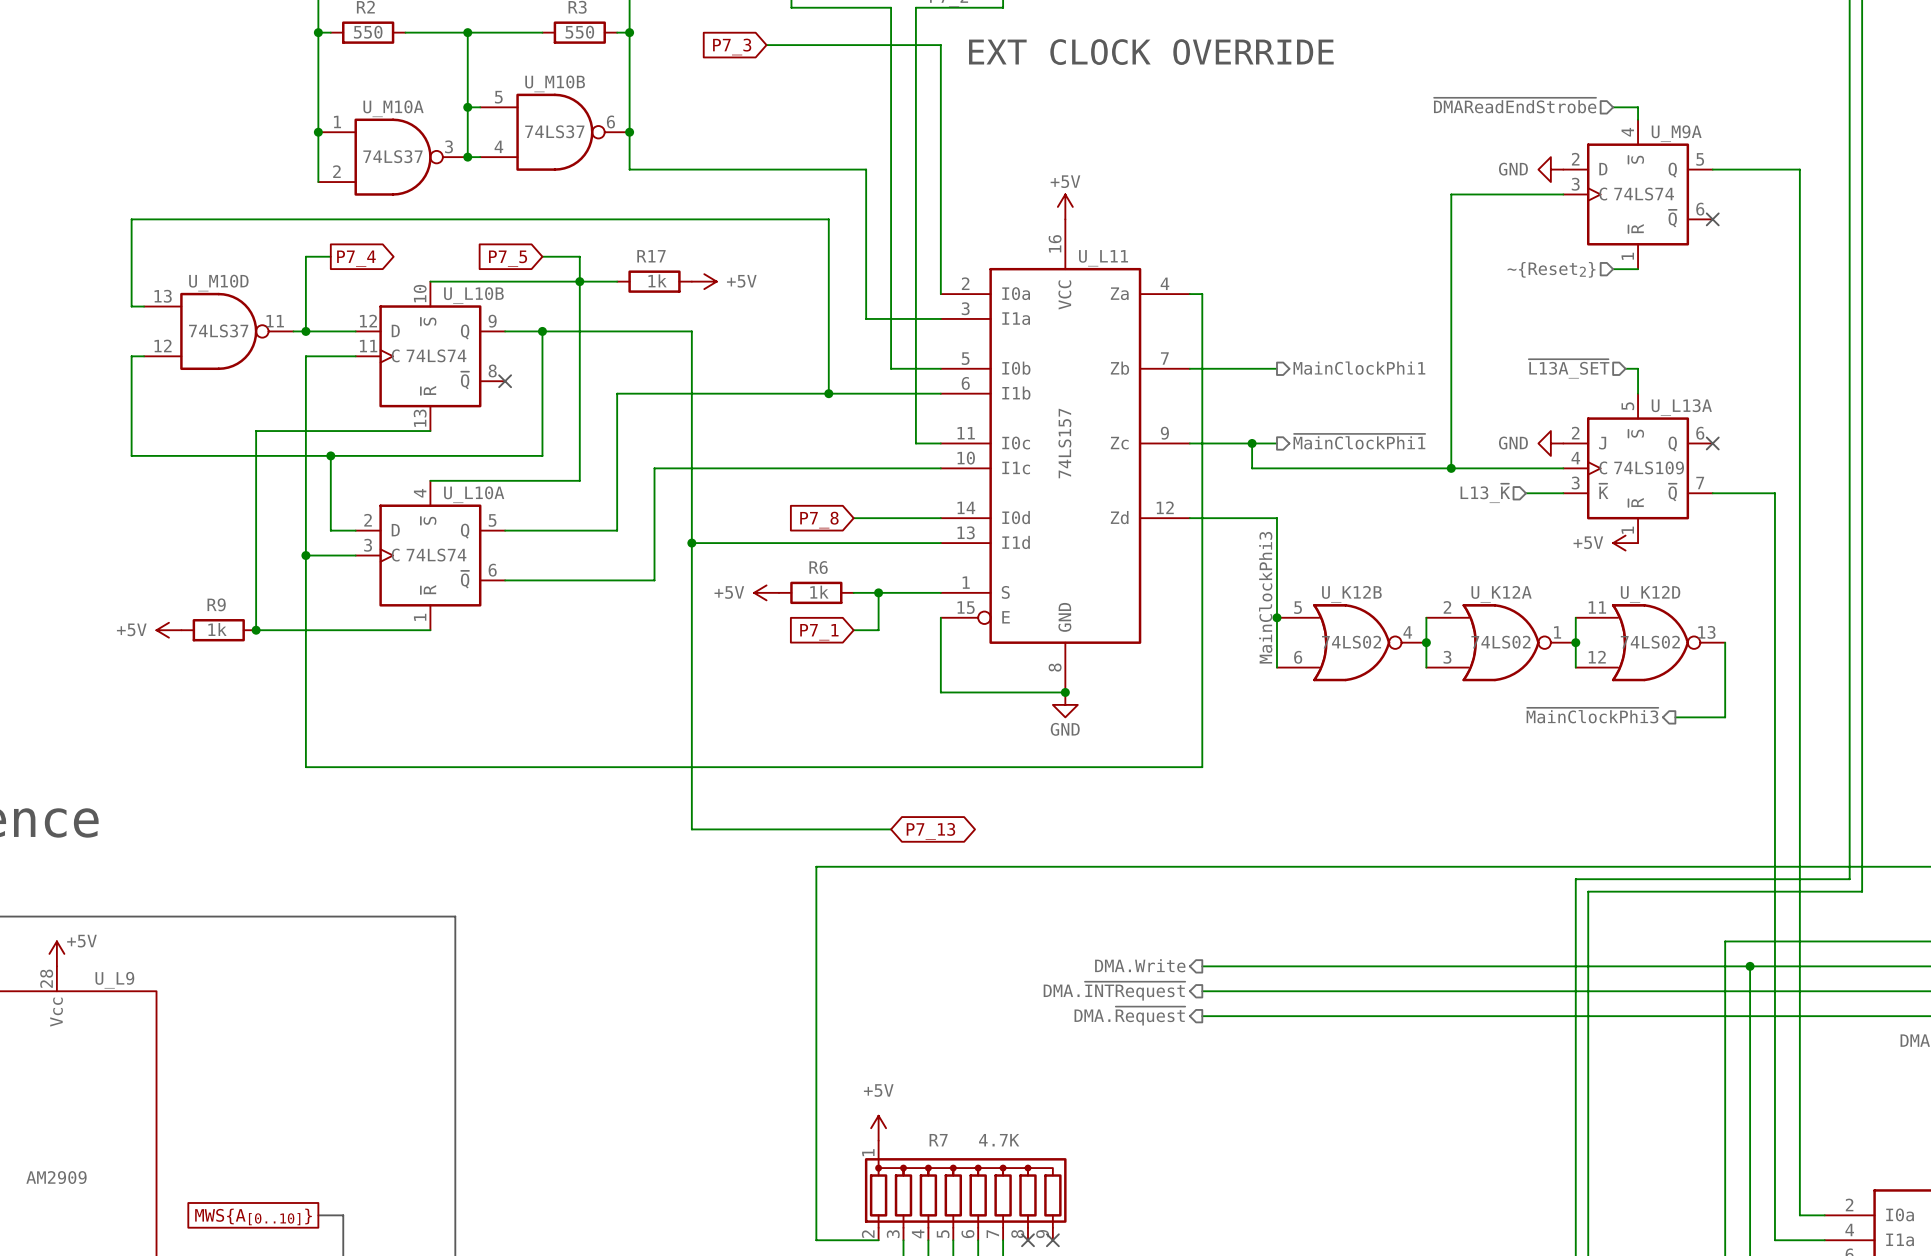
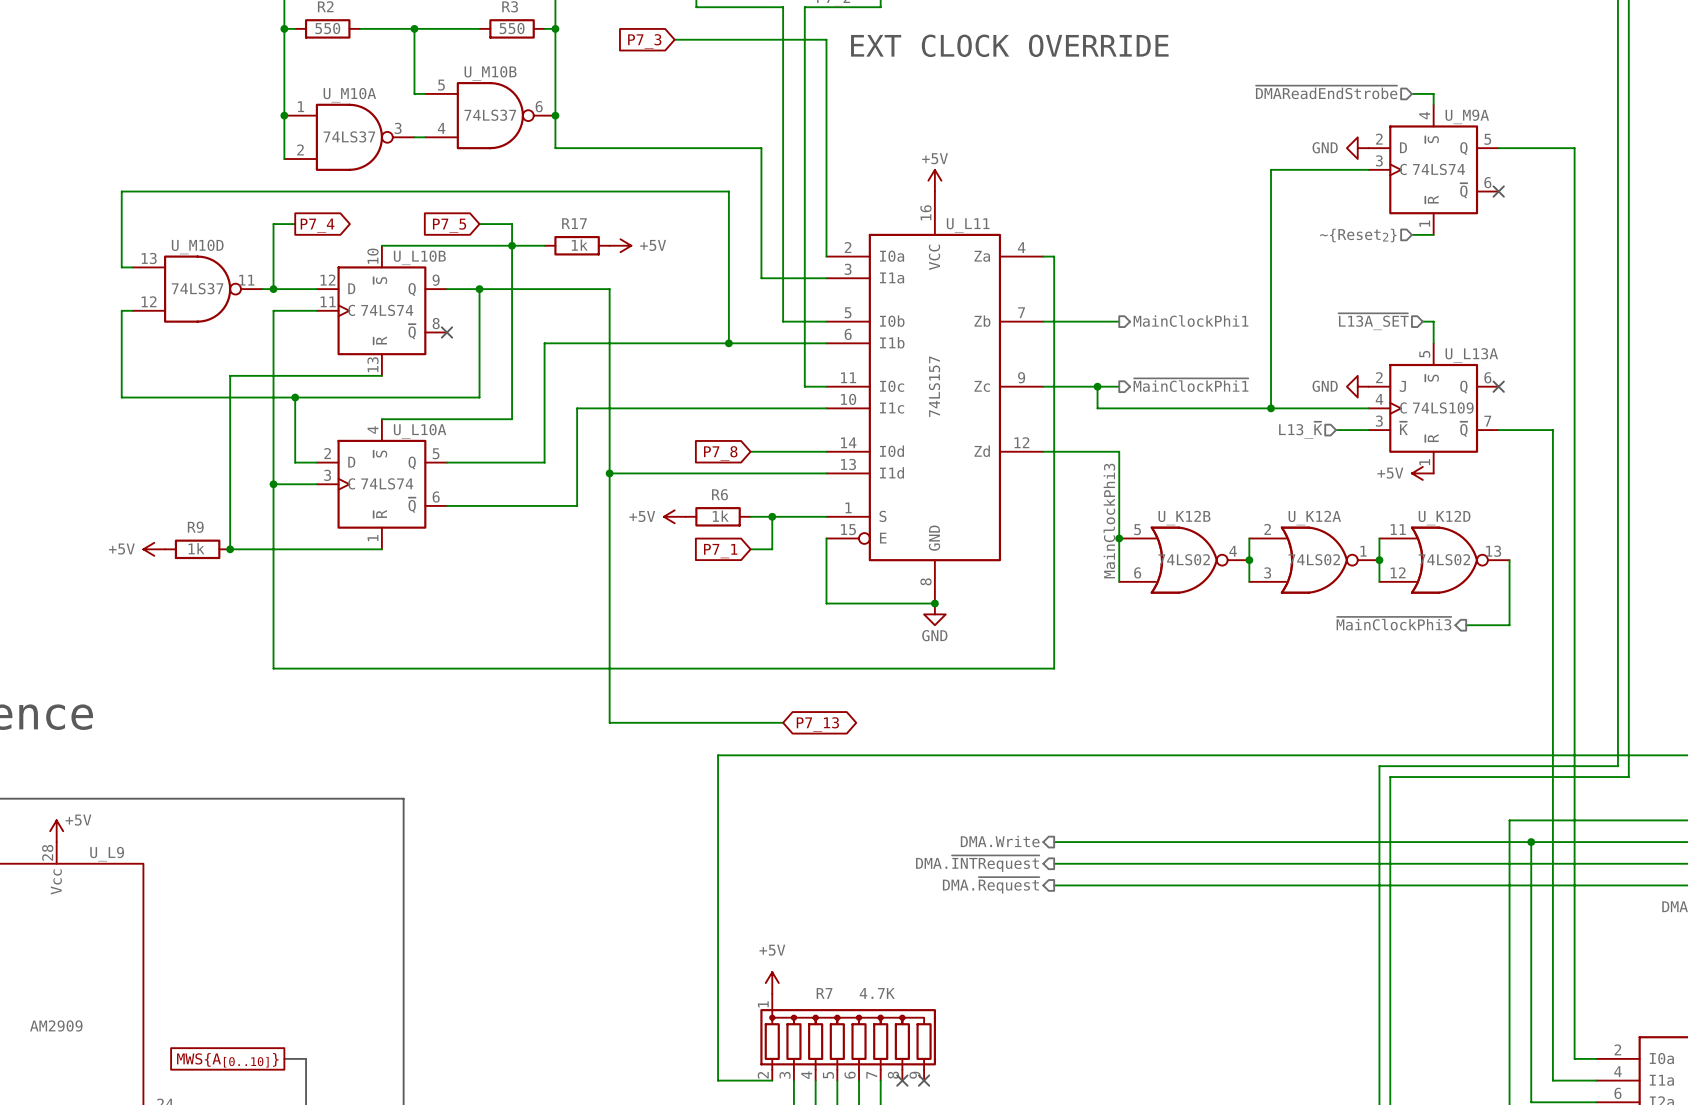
wire: (467, 107) (467, 157) -> none
junction: (467, 107) -> none
junction: (467, 157) -> none

